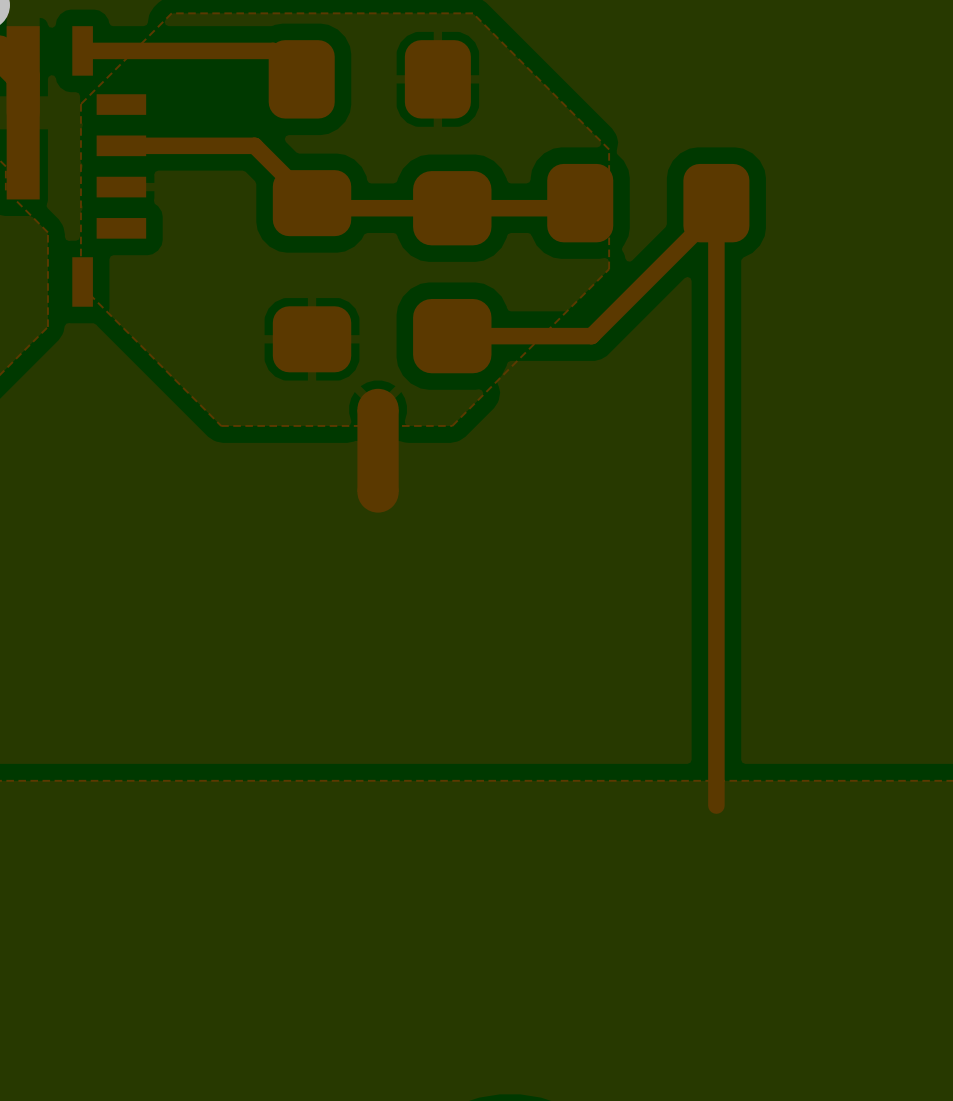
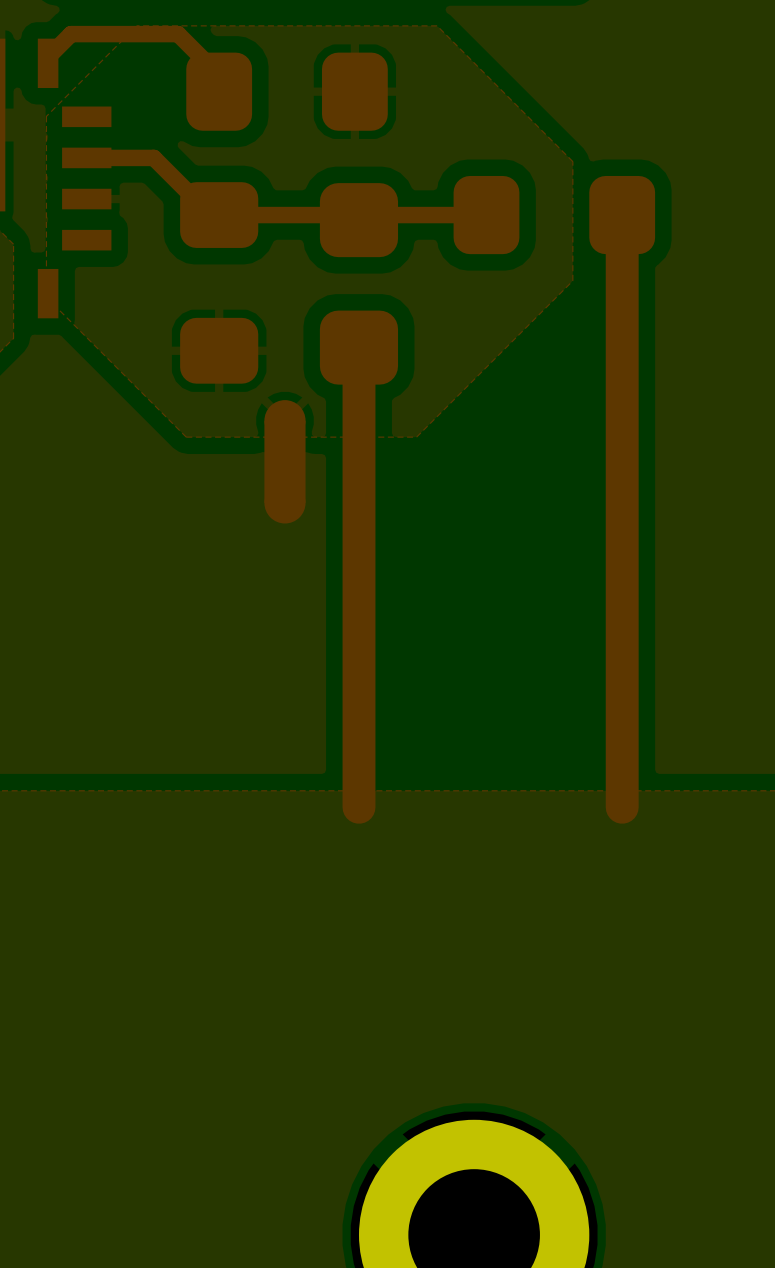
top track: none -> (46, 58) (71, 34) (178, 34) (219, 75)
top track: (82, 50) (273, 50) (301, 79) -> none
part position: (369, 79) -> (287, 91)
top track: (188, 145) (254, 145) (317, 208) (575, 208) (580, 203) -> (153, 157) (210, 215) (490, 215)
part position: (648, 203) -> (554, 215)
top track: none -> (622, 215) (622, 807)
top track: (716, 203) (716, 805) -> none
top track: (716, 211) (591, 336) (452, 336) -> none
part position: (312, 271) -> (219, 282)
part position: (452, 272) -> (358, 283)
top track: none -> (359, 346) (359, 807)
part position: (378, 450) -> (284, 461)

